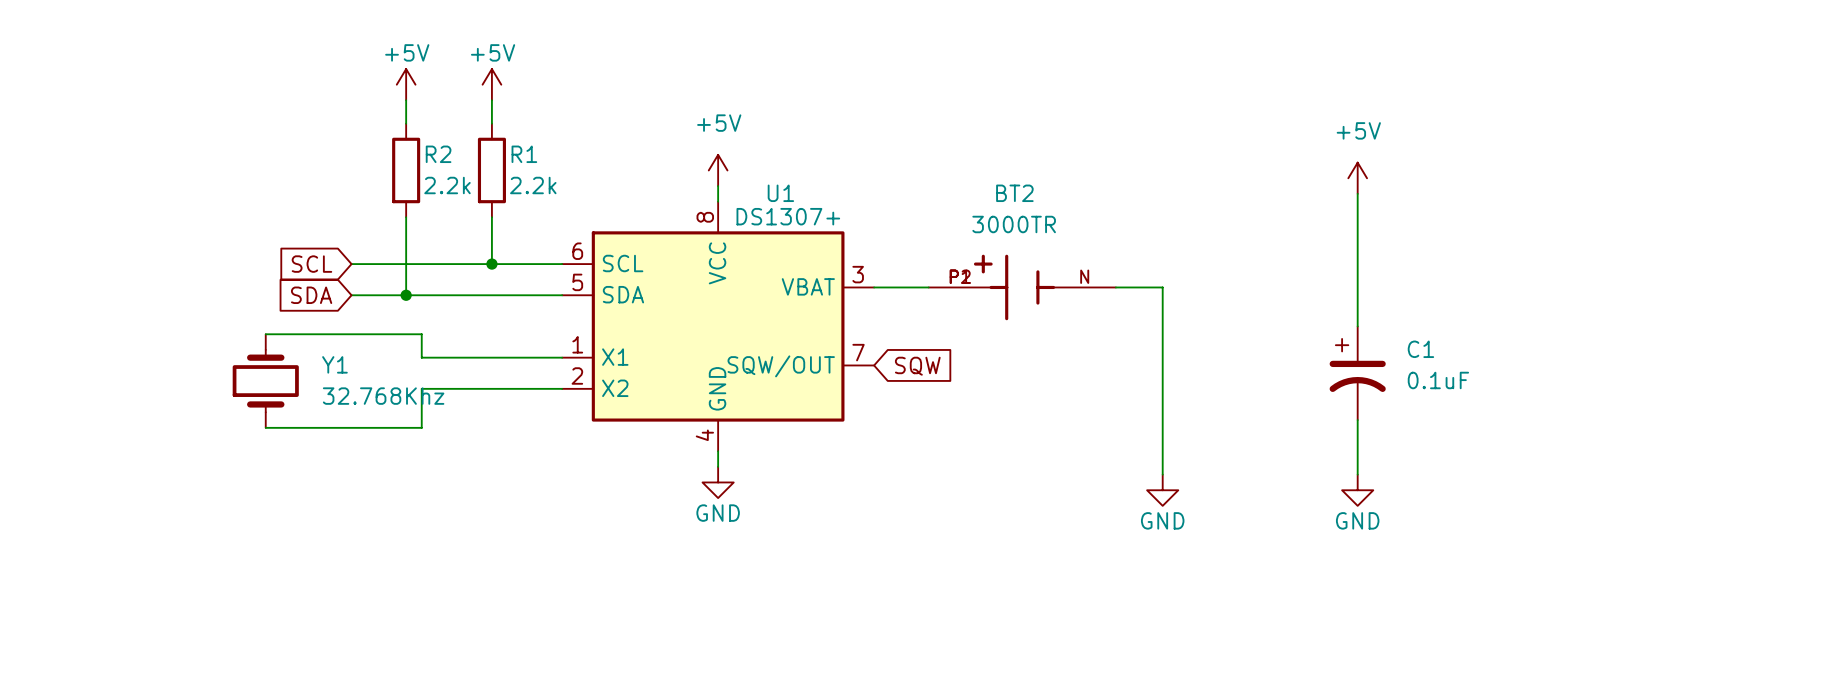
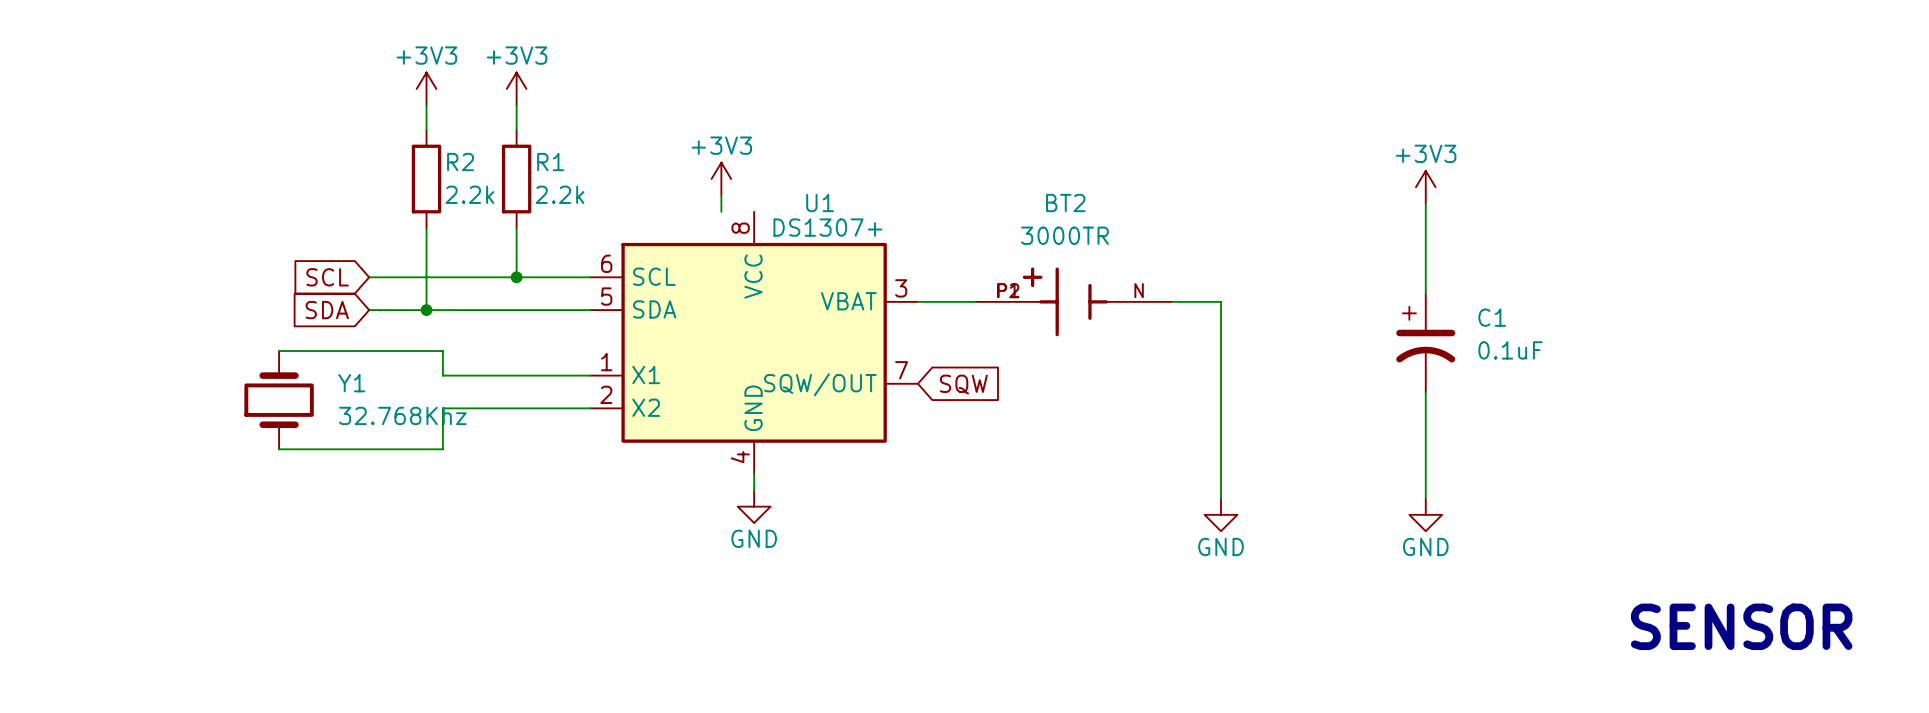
power symbol: +5V (406, 84) -> +3V3 (426, 88)
power symbol: +5V (491, 84) -> +3V3 (516, 88)
power symbol: none -> +3V3 (721, 179)
power symbol: +5V (718, 170) -> none
power symbol: +5V (1357, 178) -> +3V3 (1425, 187)
wire: (718, 186) (718, 201) -> (721, 195) (721, 211)
C1 position: (1357, 373) -> (1425, 342)
text: none -> SENSOR (1741, 626)

